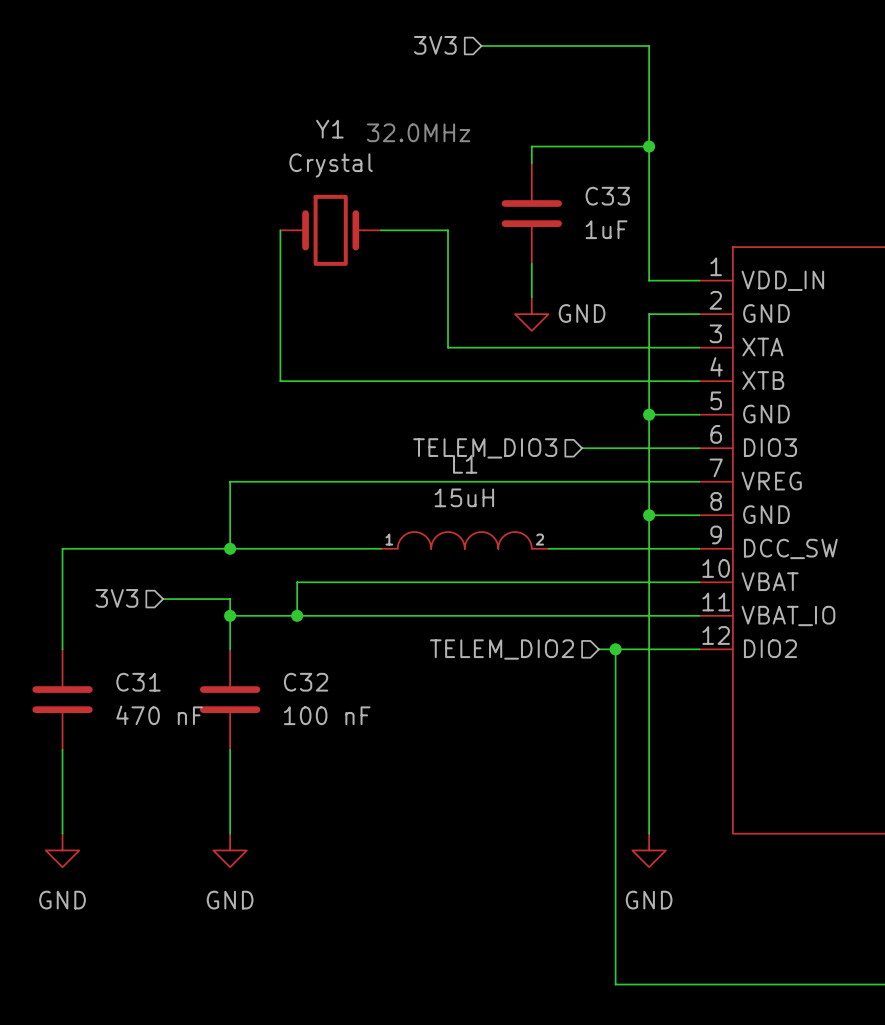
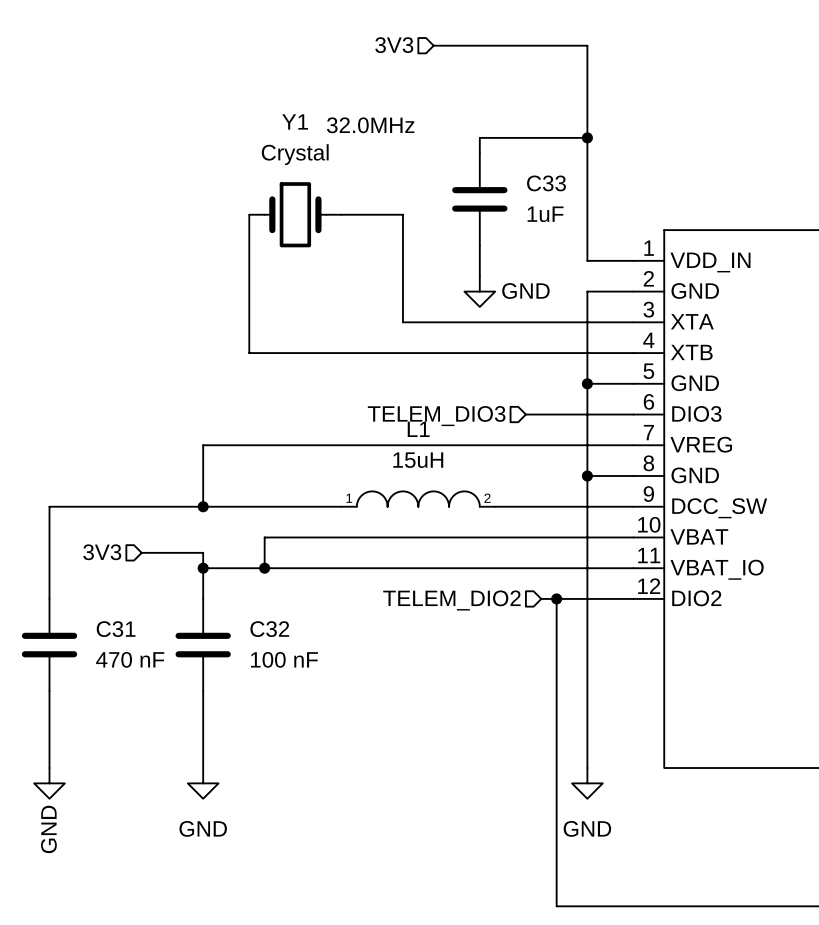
power symbol text rotation: 0° (62, 900) -> 90° counterclockwise (48, 829)

